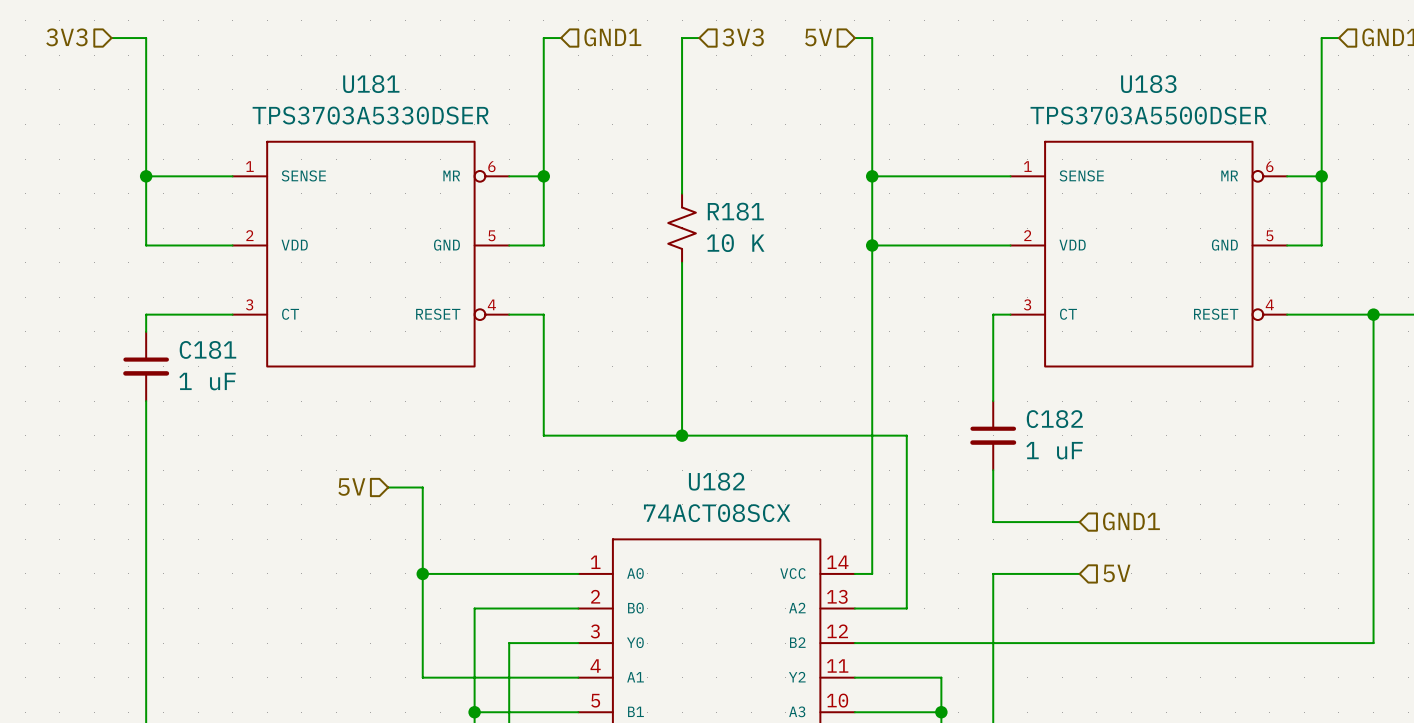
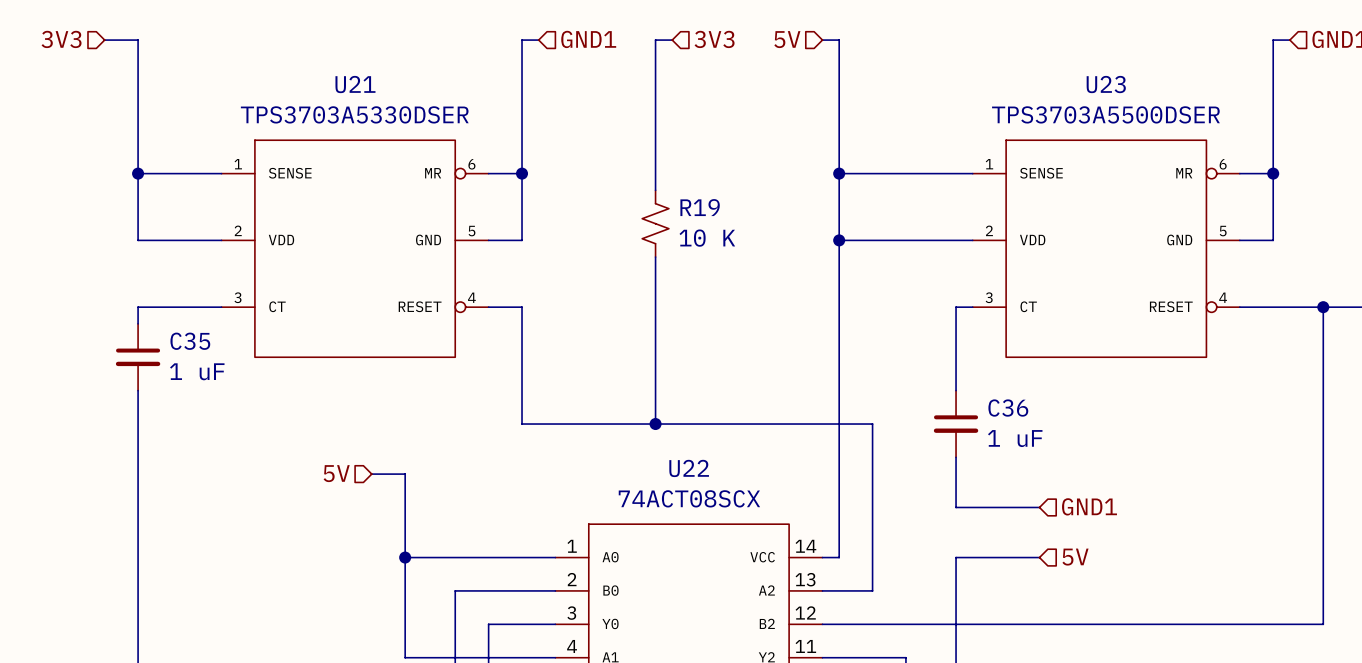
U181 name: U181 (371, 84) -> U21 (355, 84)
U183 name: U183 (1148, 84) -> U23 (1106, 84)
R181 name: R181 (735, 211) -> R19 (700, 207)
C181 name: C181 (207, 349) -> C35 (190, 341)
C182 name: C182 (1054, 419) -> C36 (1008, 408)
U182 name: U182 (716, 481) -> U22 (689, 468)

